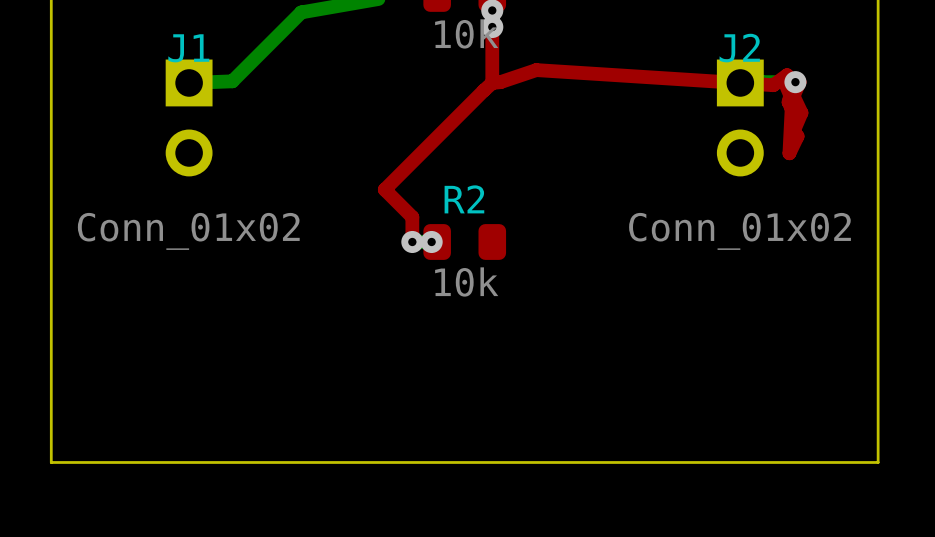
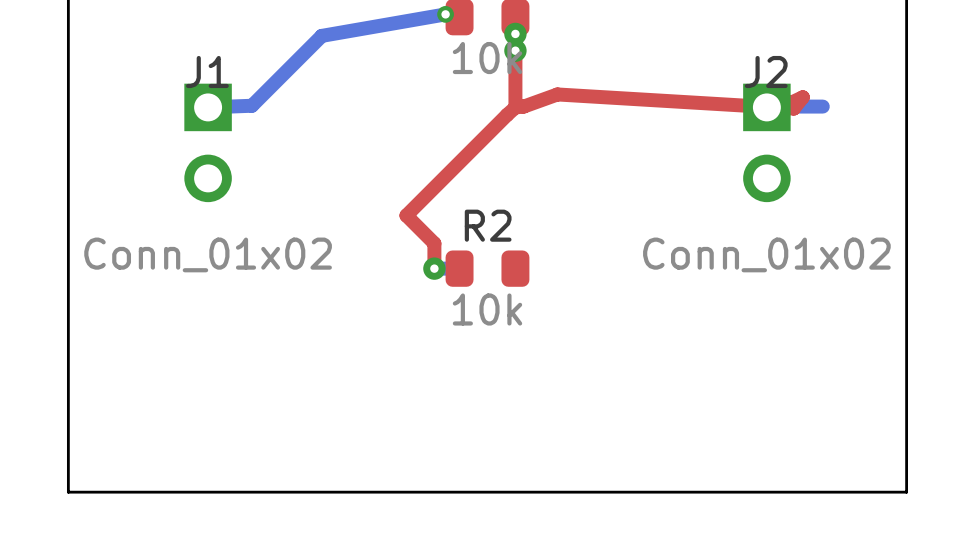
top track: (500, 82) (536, 70) (773, 85) (787, 75) (785, 82) (790, 95) (788, 102) (791, 108) (789, 153) (797, 136) (793, 131) (801, 112) (793, 96) (799, 82) (795, 82) -> (523, 106) (557, 94) (793, 108) (802, 97) (791, 102) (775, 105) (765, 107) (766, 107)
via: (795, 82) -> none
via: (431, 241) -> none

